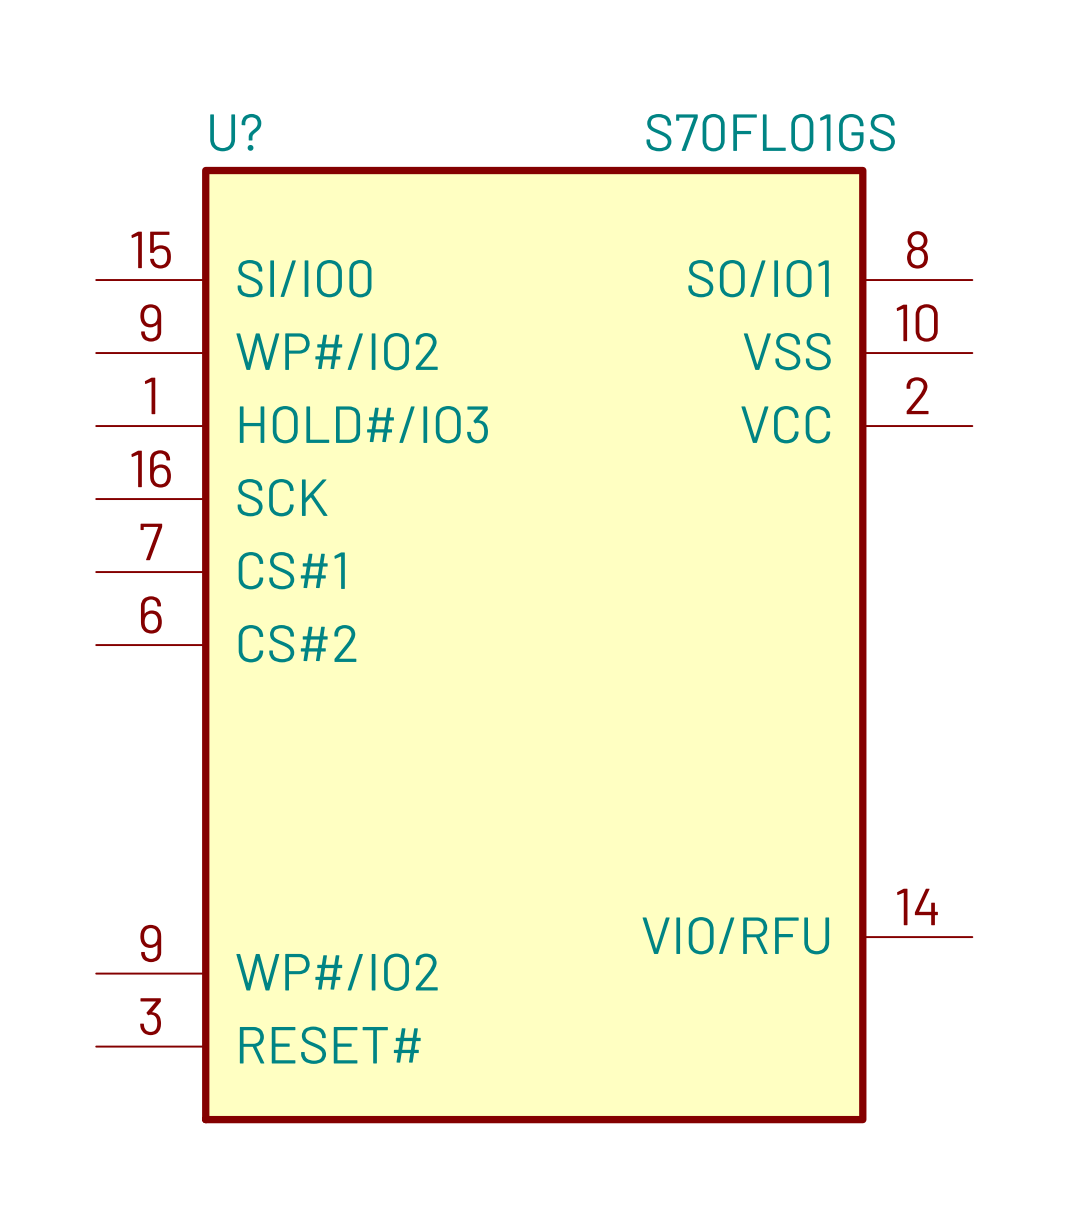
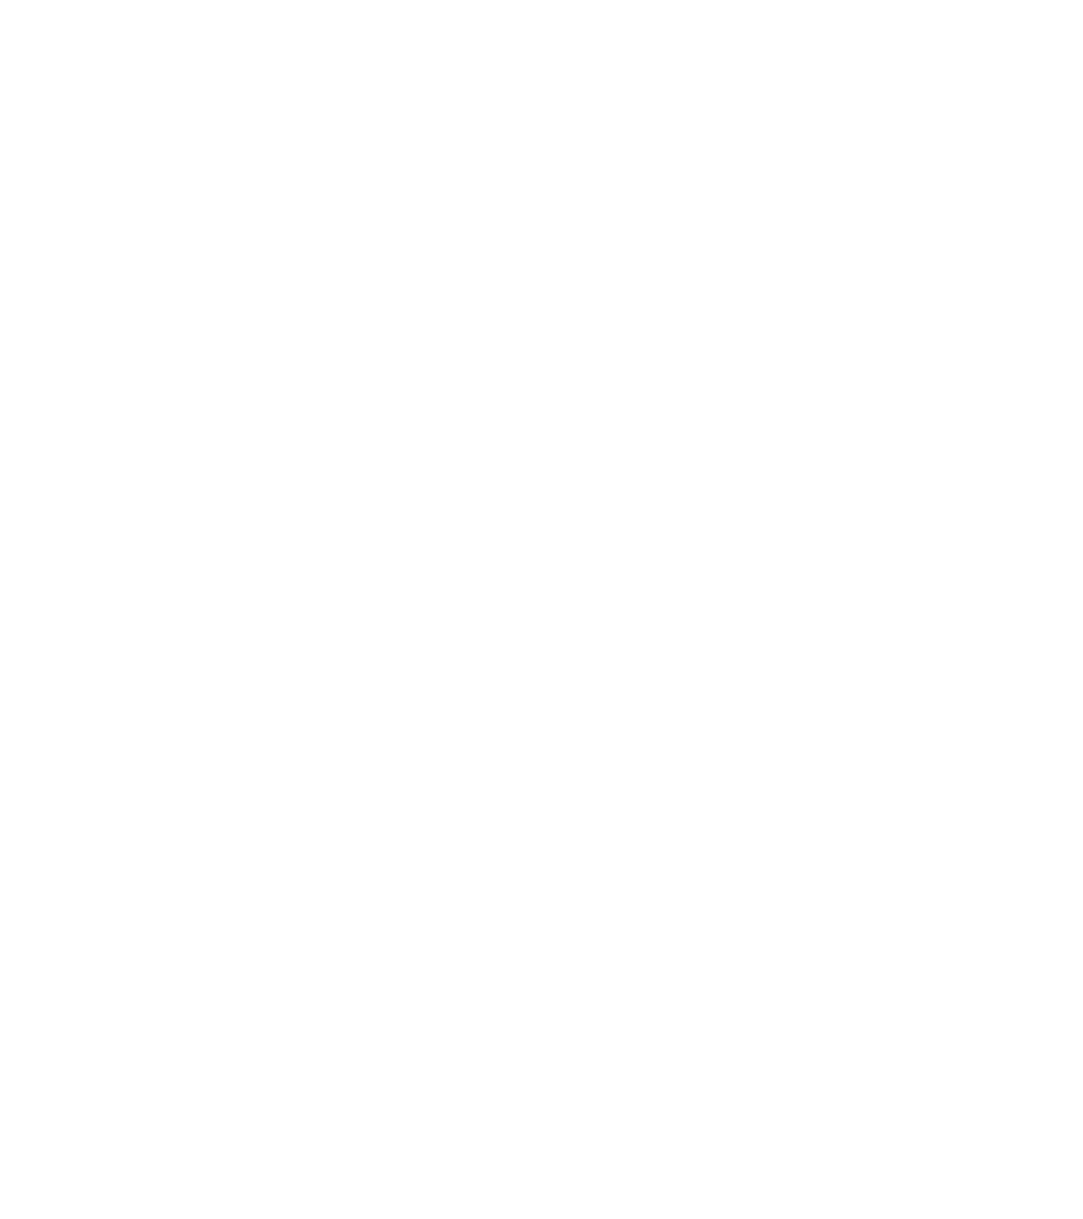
U?: S70FL01GS (534, 645) -> none

